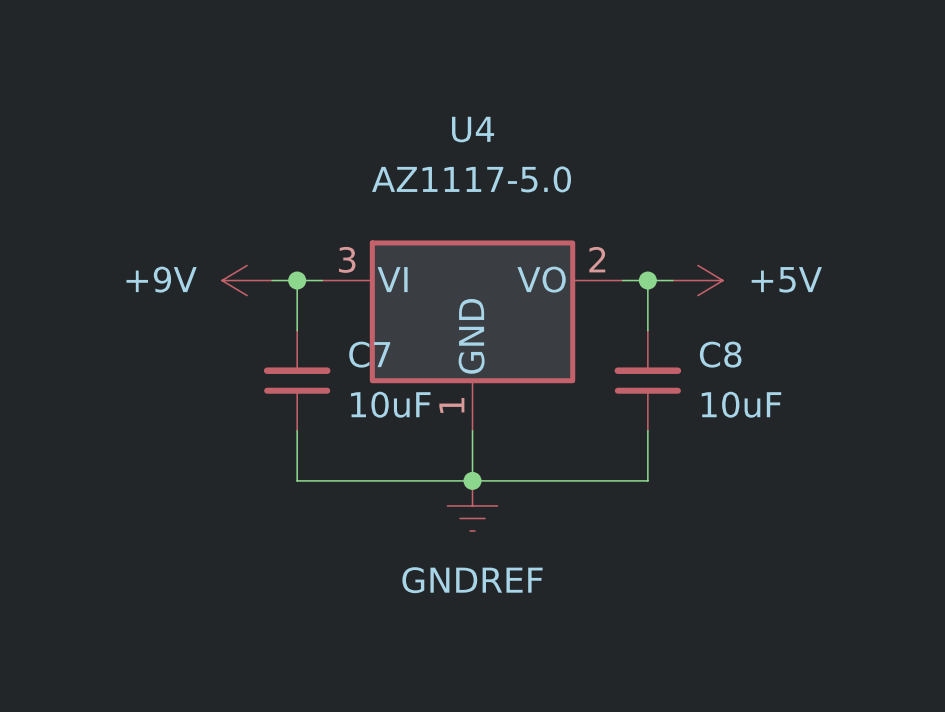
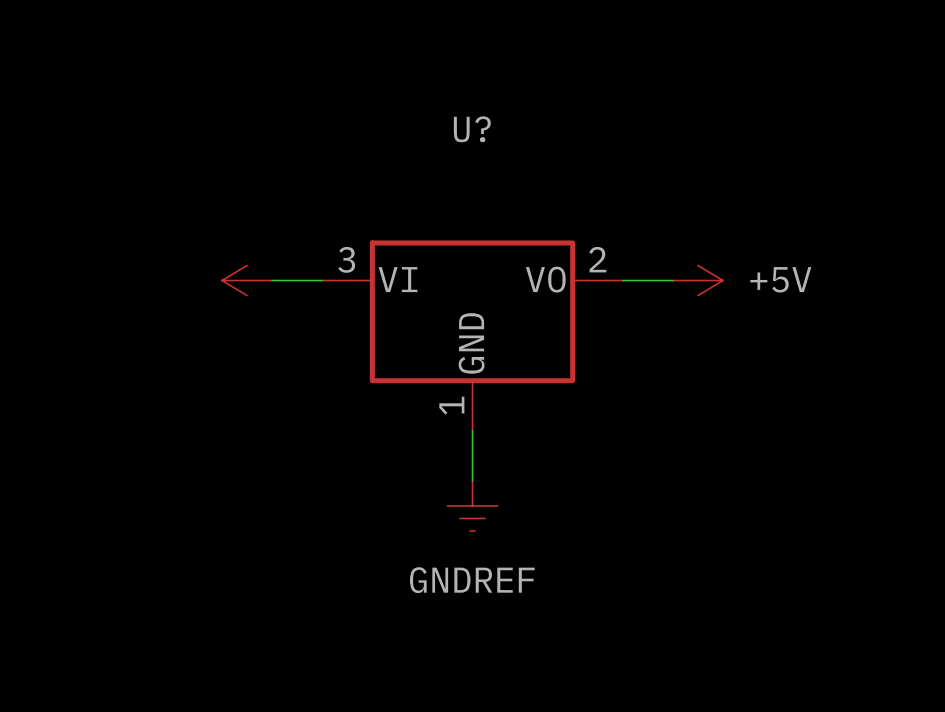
U4 name: U4 (473, 129) -> U? (472, 129)
U4 value: AZ1117-5.0 (471, 179) -> none
power symbol text: +9V (161, 279) -> none
wire: (297, 280) (297, 330) -> none
junction: (297, 280) -> none
wire: (647, 280) (647, 330) -> none
junction: (647, 280) -> none
C7: 10uF (297, 380) -> none
C8: 10uF (647, 380) -> none
wire: (297, 430) (297, 480) (647, 480) (647, 430) -> none
junction: (472, 480) -> none

